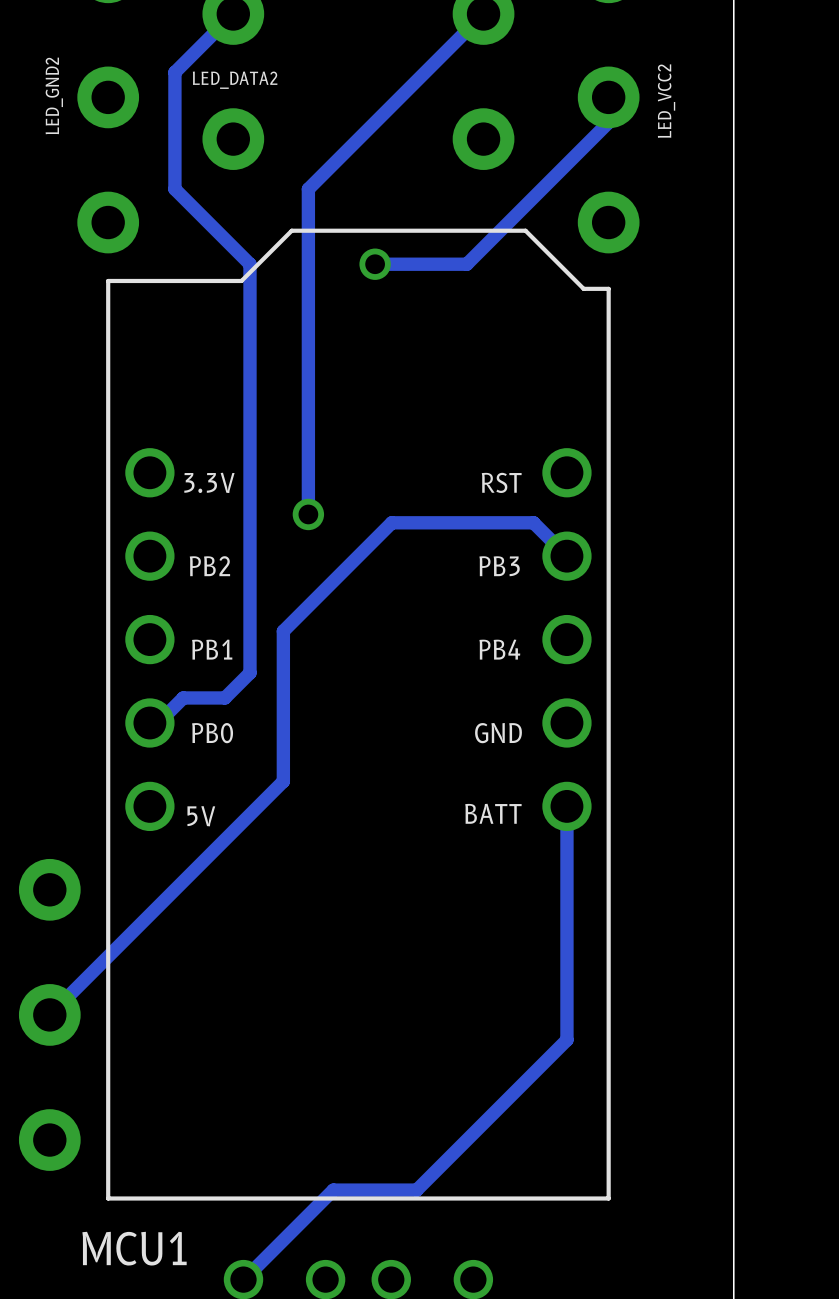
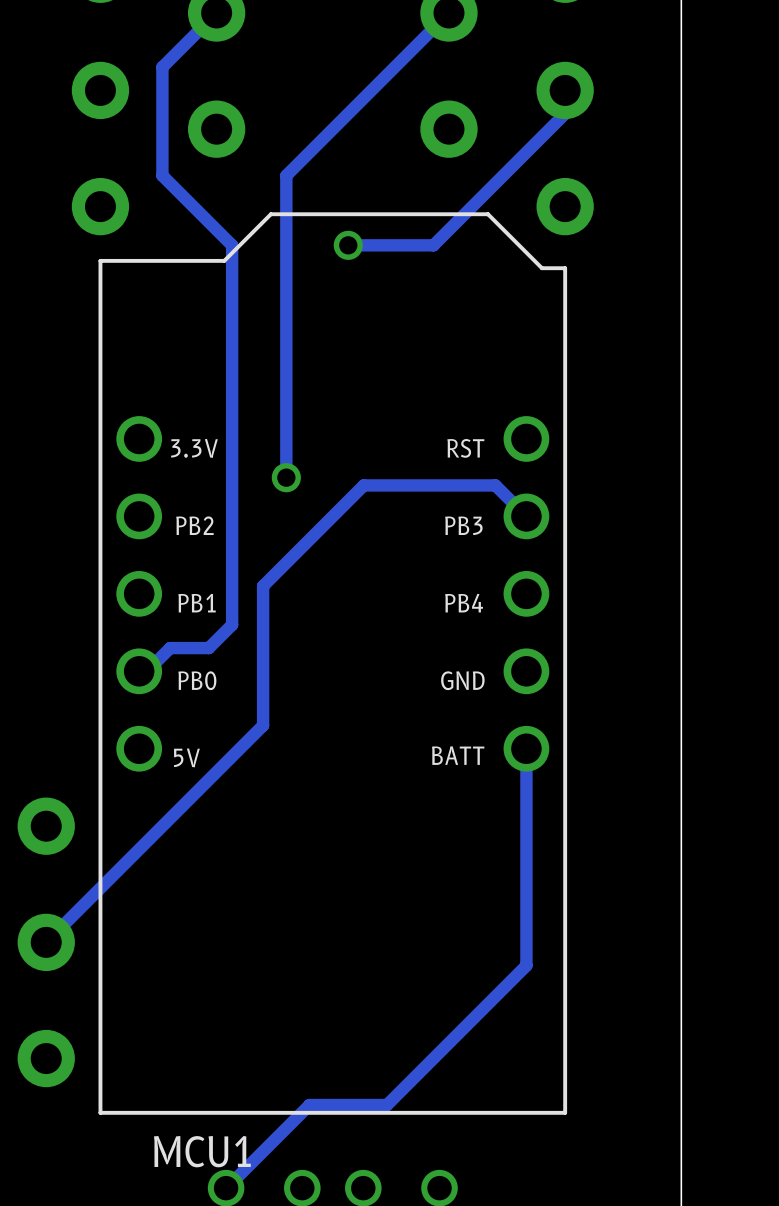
LED_DATA2 name: LED_DATA2 (235, 80) -> none
LED_GND2 name: LED_GND2 (54, 95) -> none
LED_VCC2 name: LED_VCC2 (666, 101) -> none
MCU1 name position: MCU1 (134, 1248) -> MCU1 (202, 1151)

